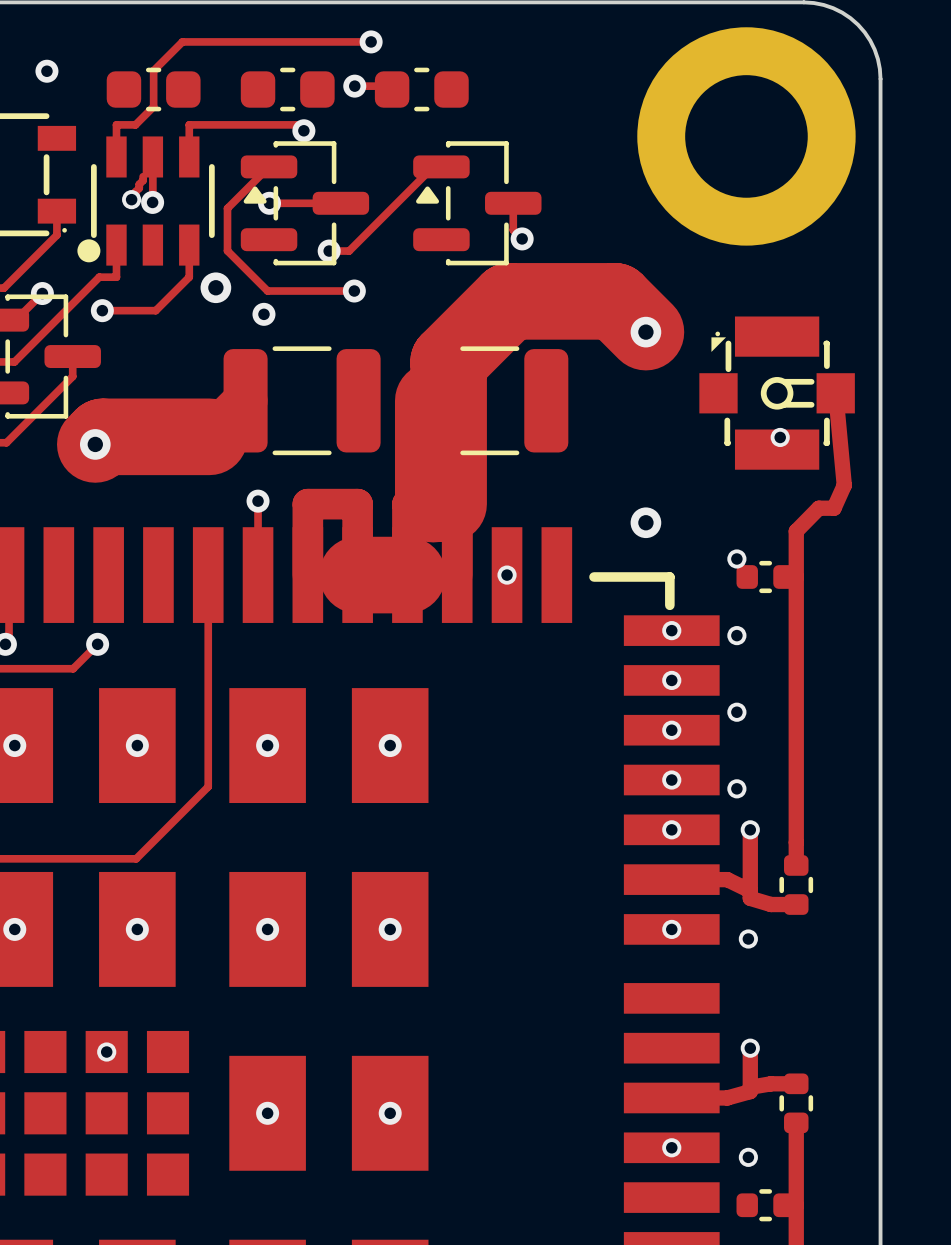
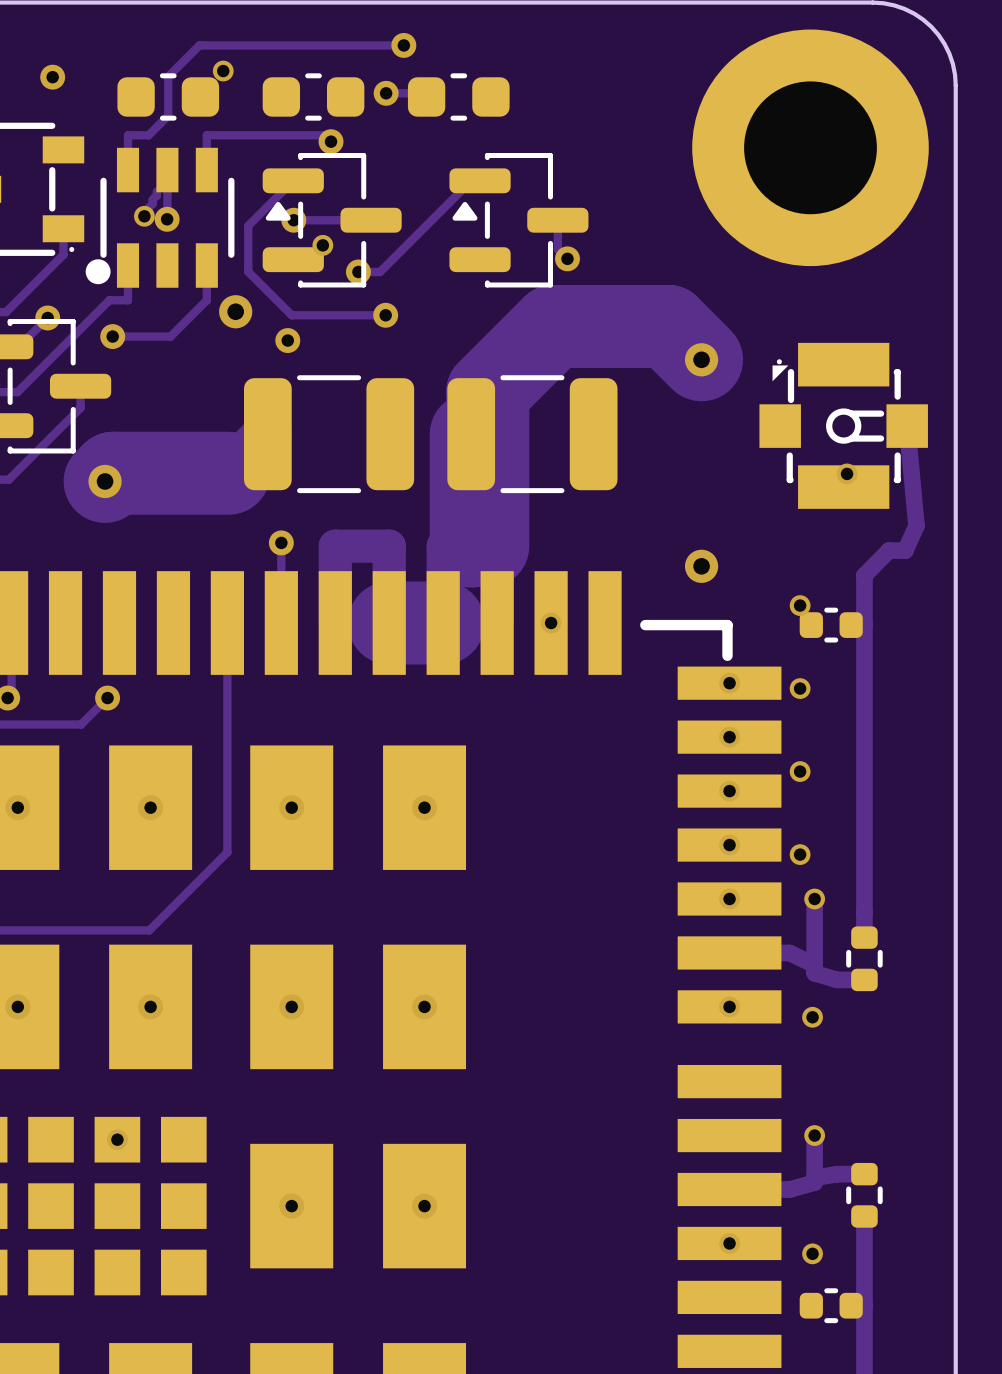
via: none -> (223, 71)
via: none -> (322, 245)

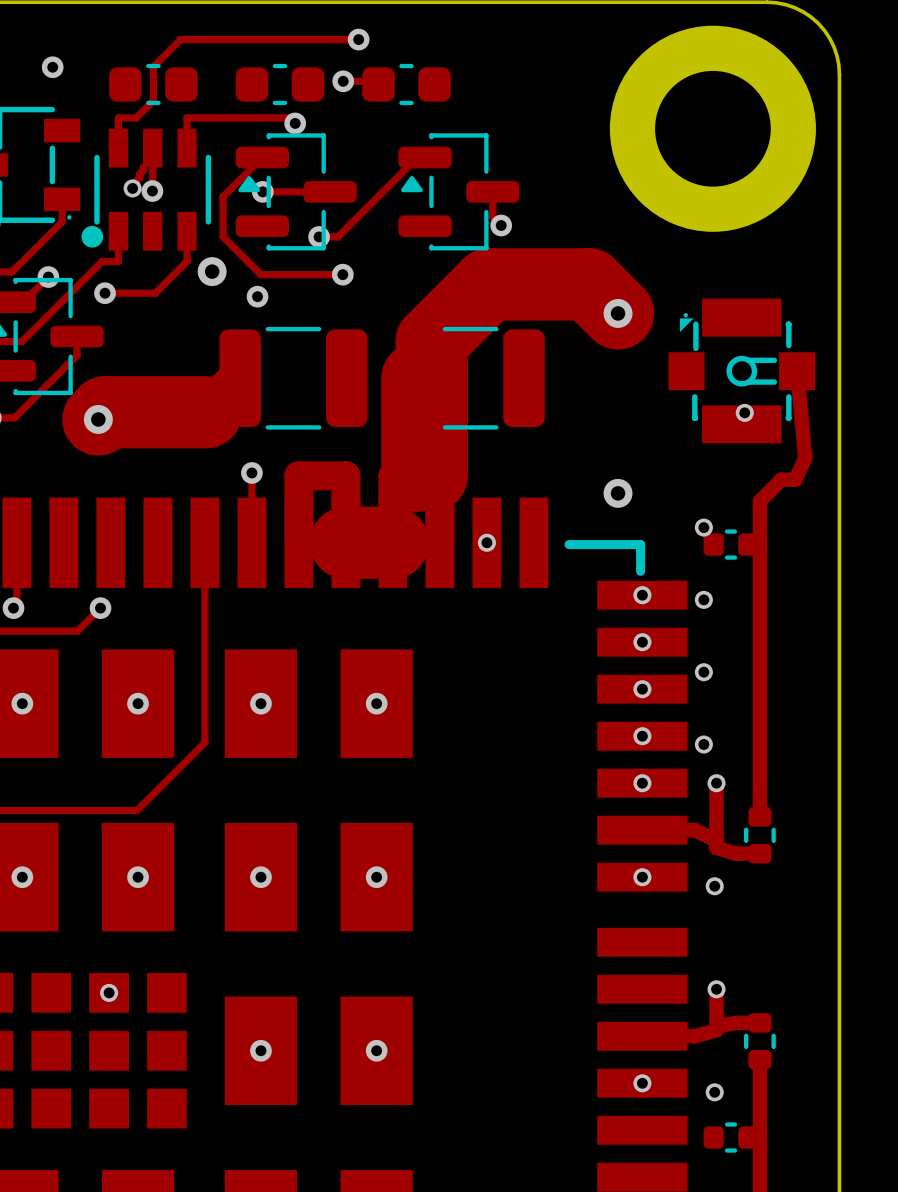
via: (223, 71) -> none
via: (322, 245) -> none

